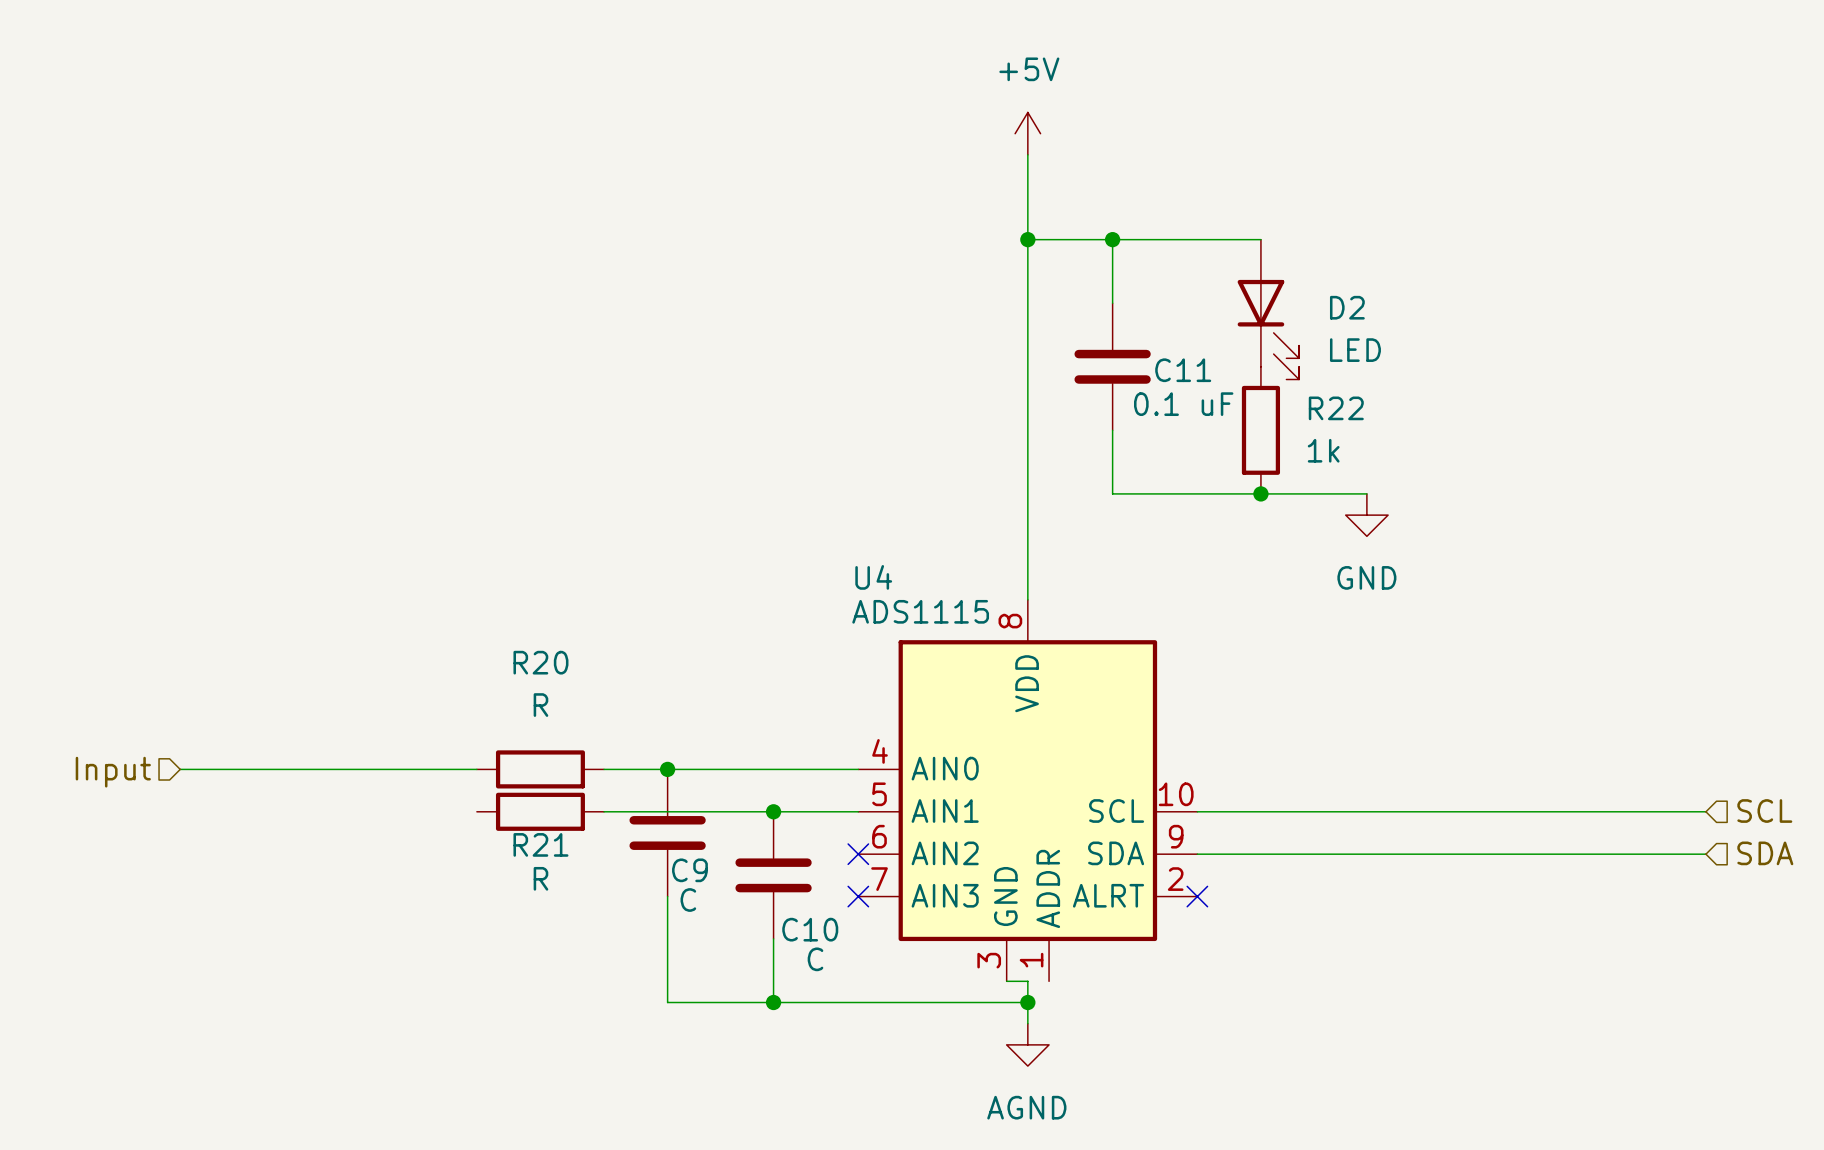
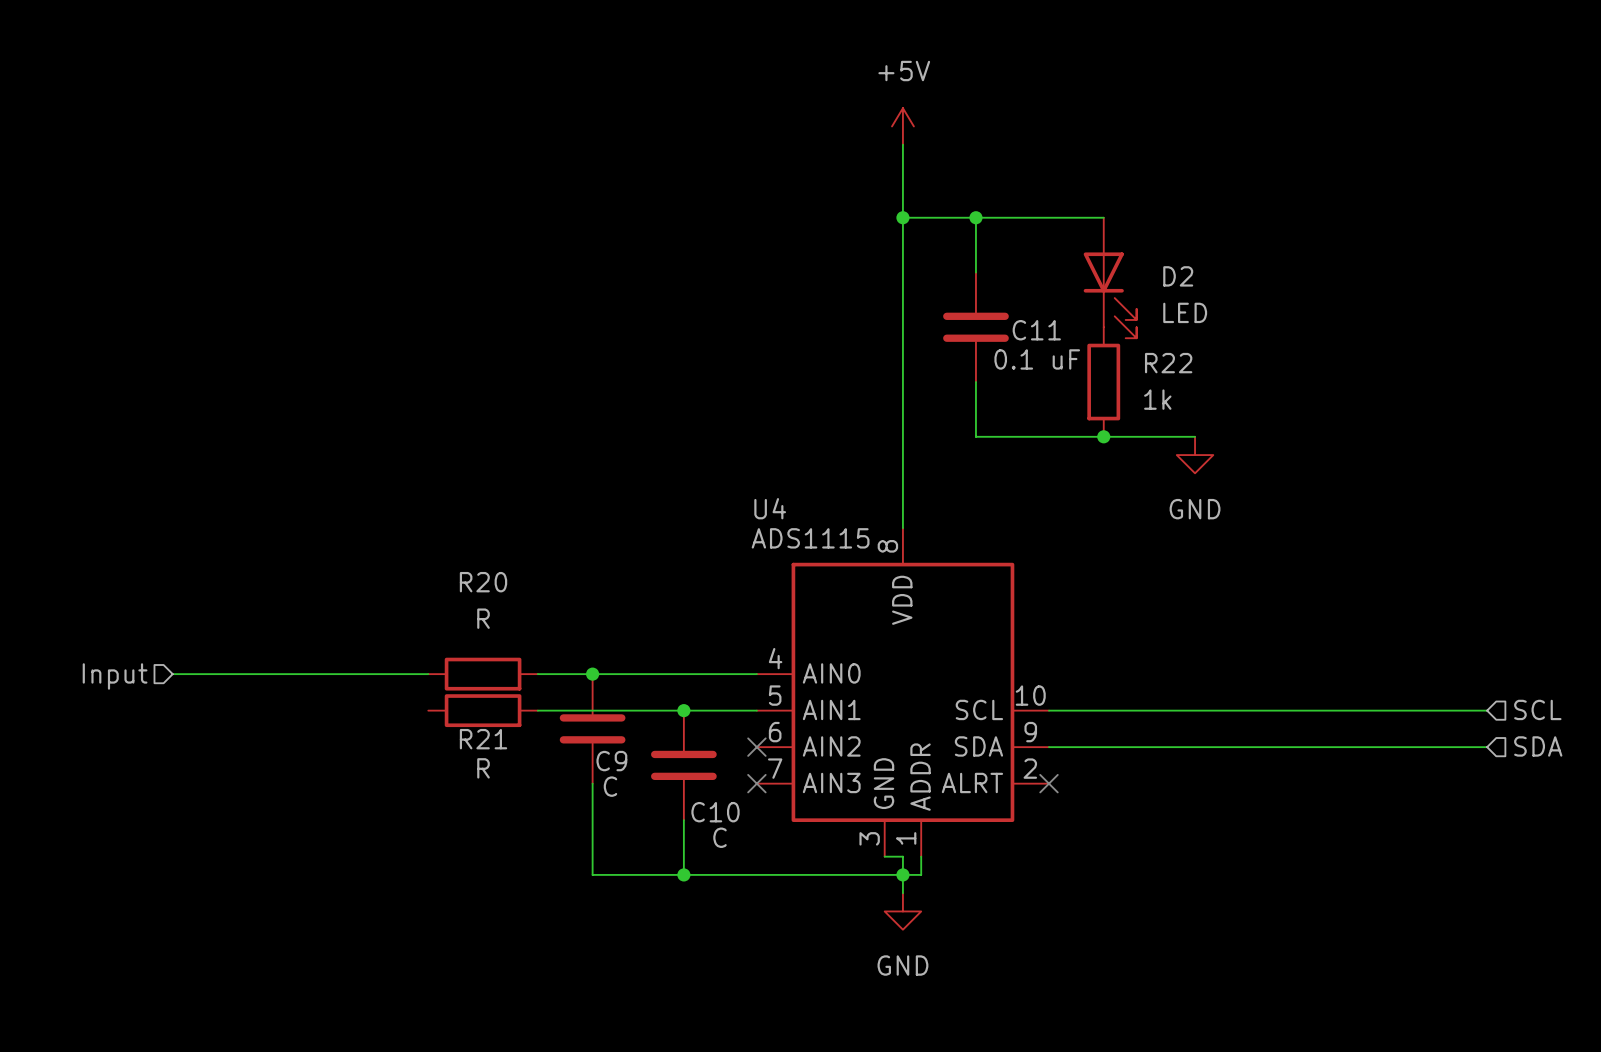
wire: none -> (921, 856) (921, 874) (902, 874)
power symbol: AGND (1027, 1044) -> GND (902, 911)

